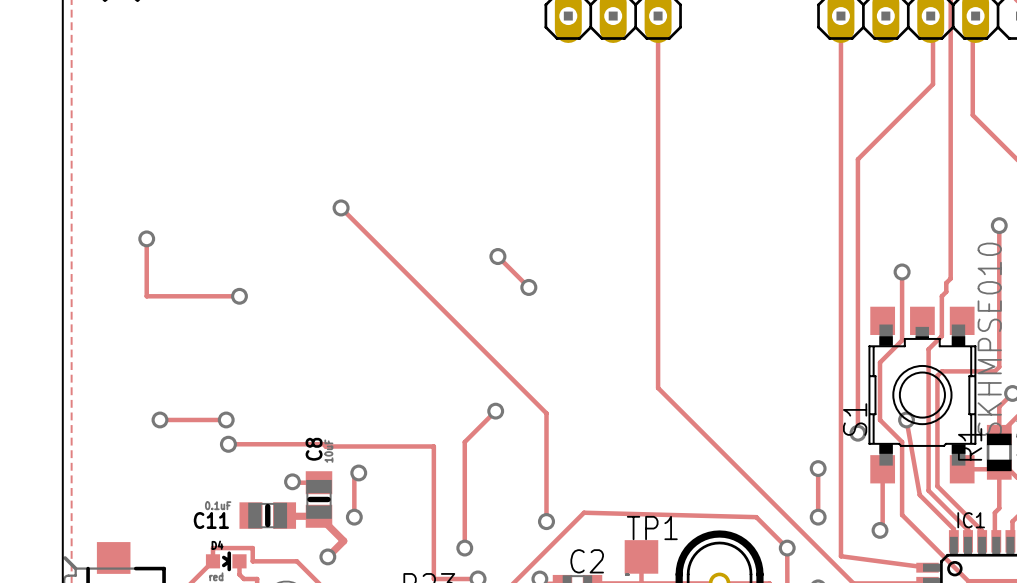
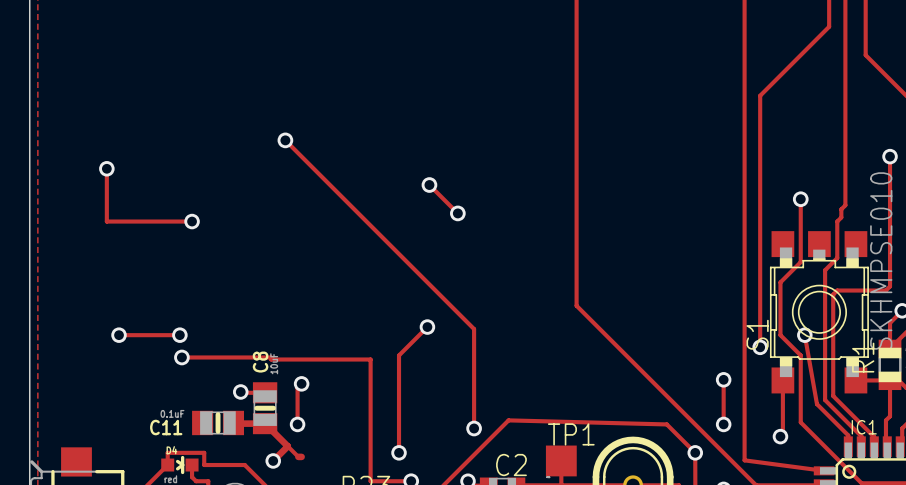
track: none -> (287, 446) (298, 456) (301, 456)

